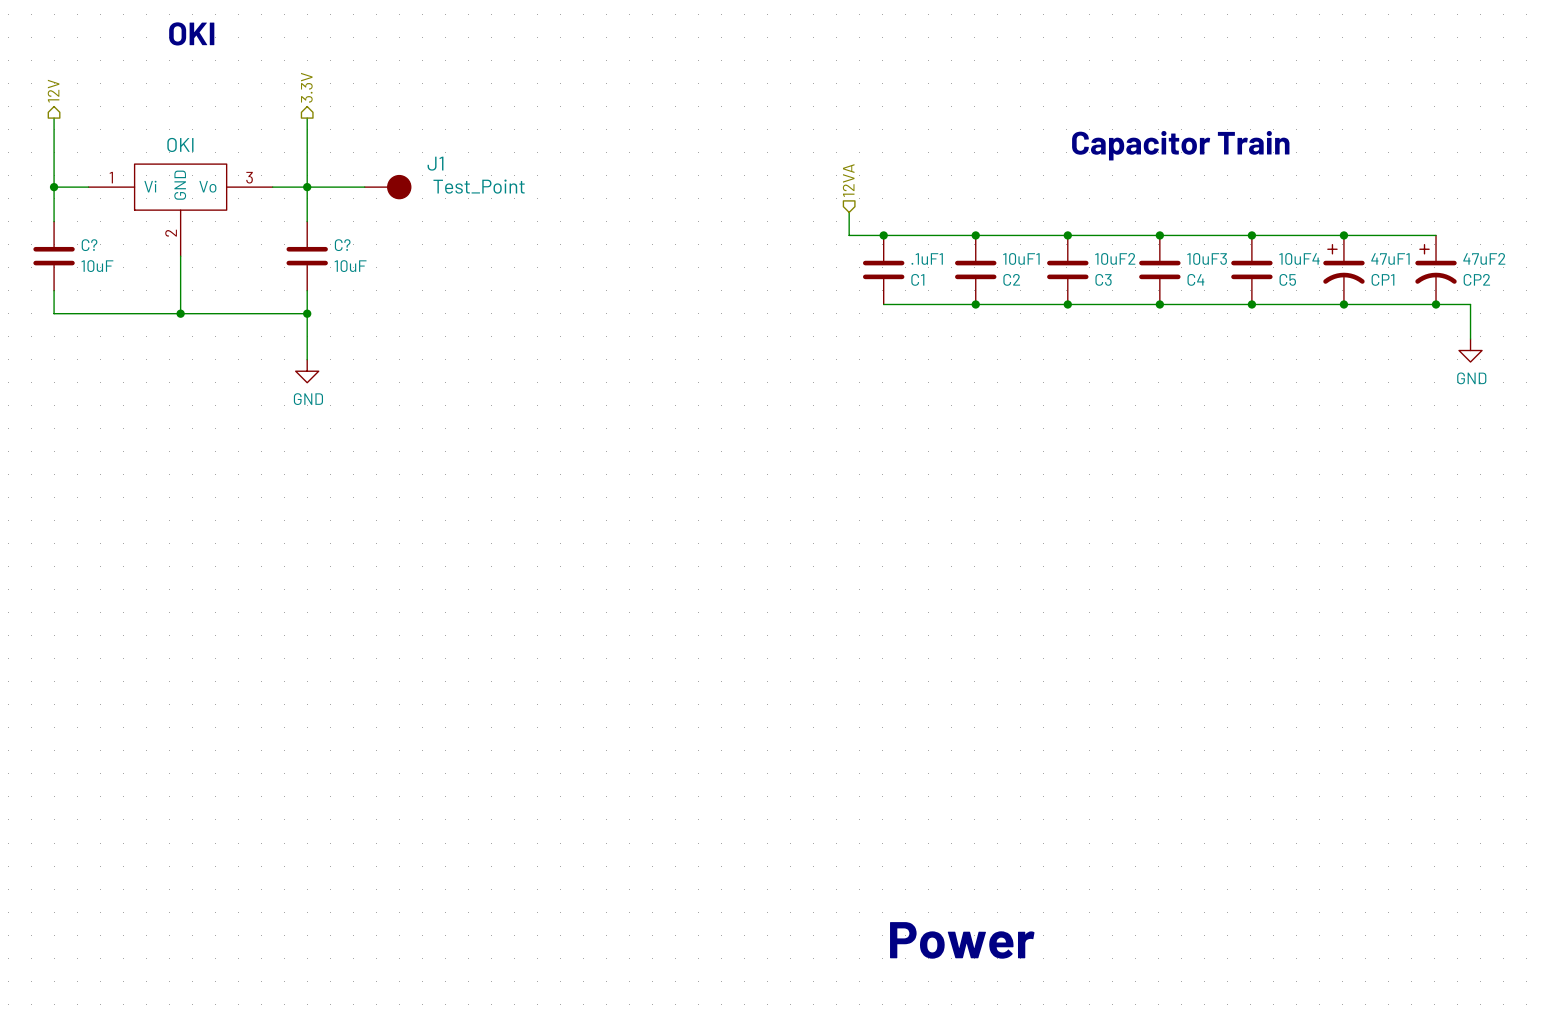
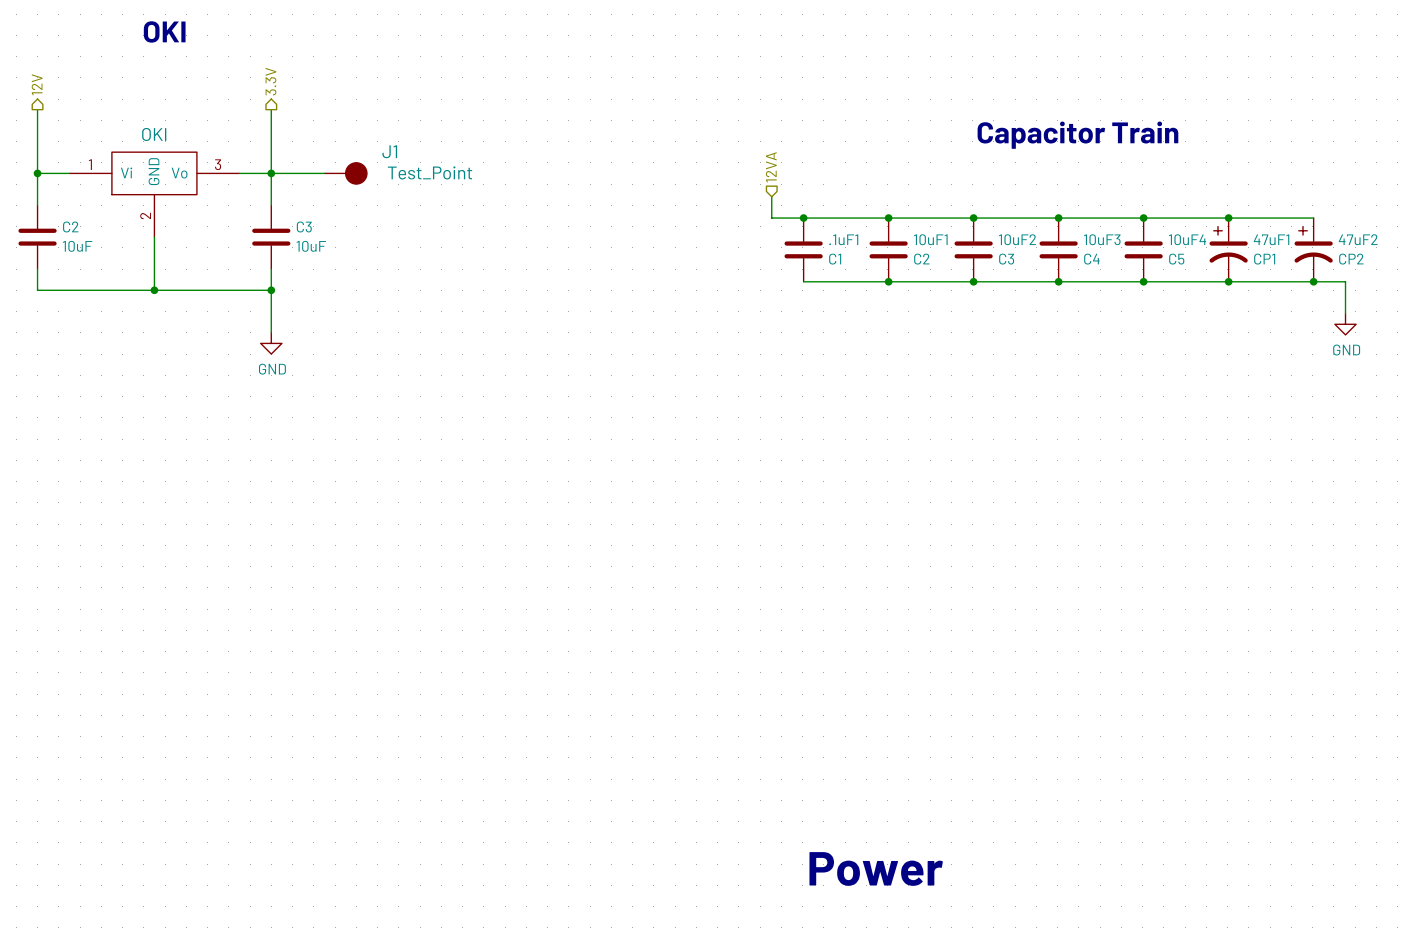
C? name: C? (89, 245) -> C2 (70, 227)
C? name: C? (342, 245) -> C3 (304, 227)

